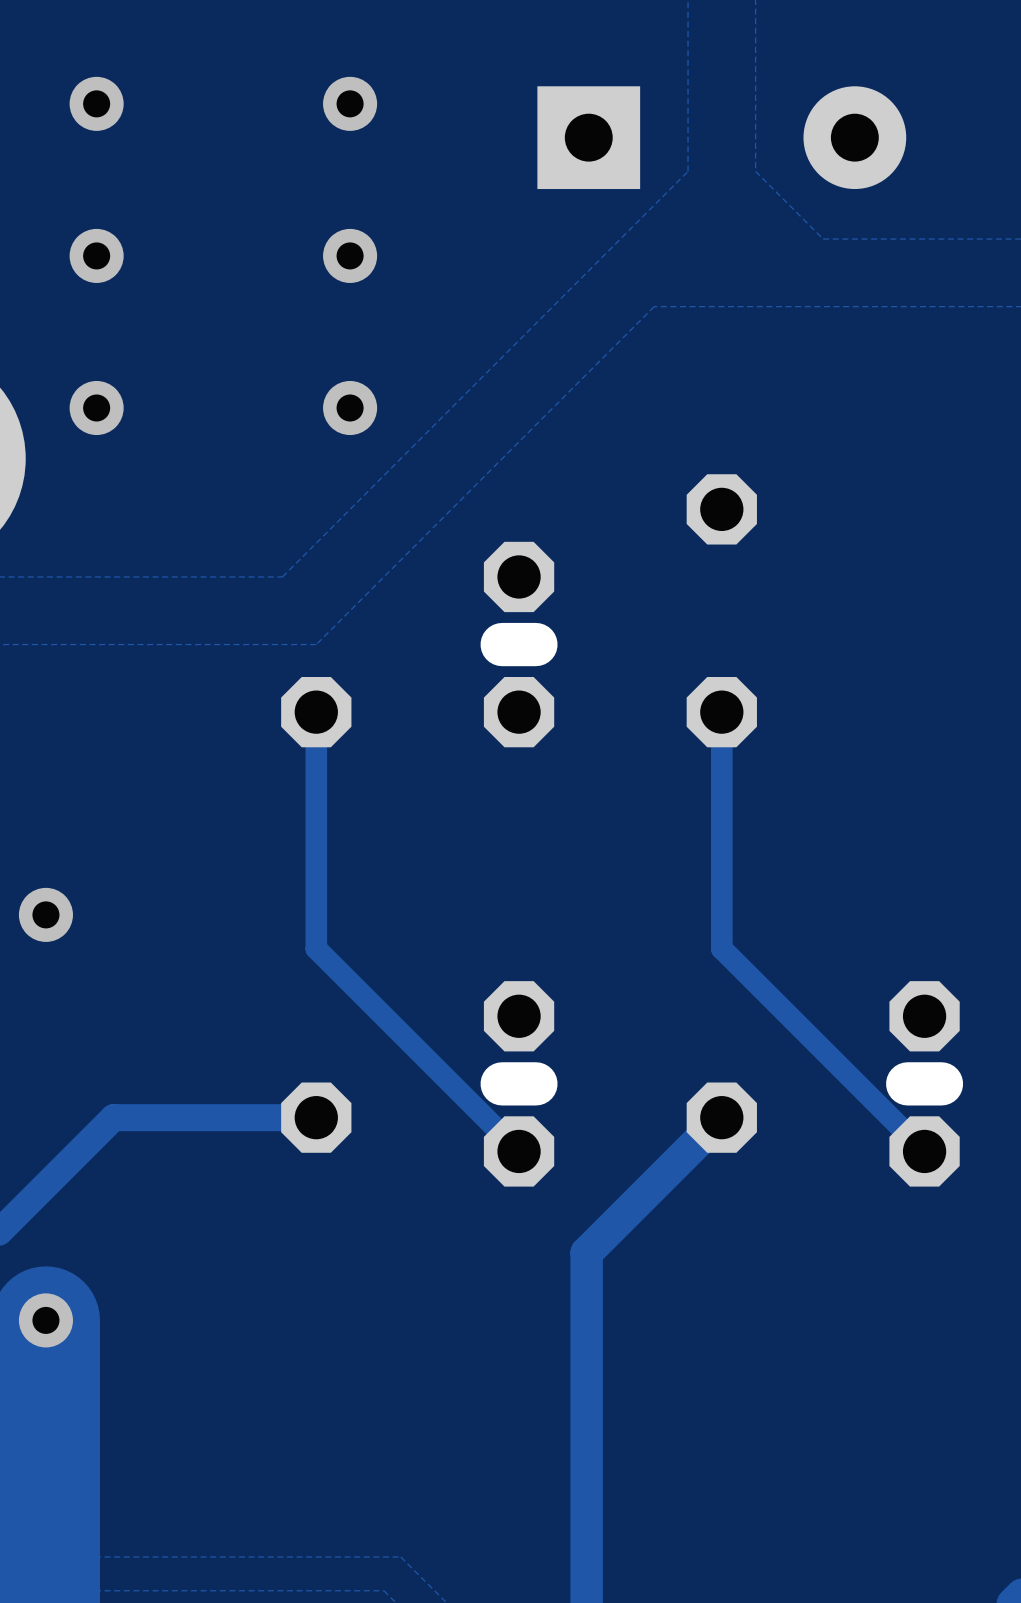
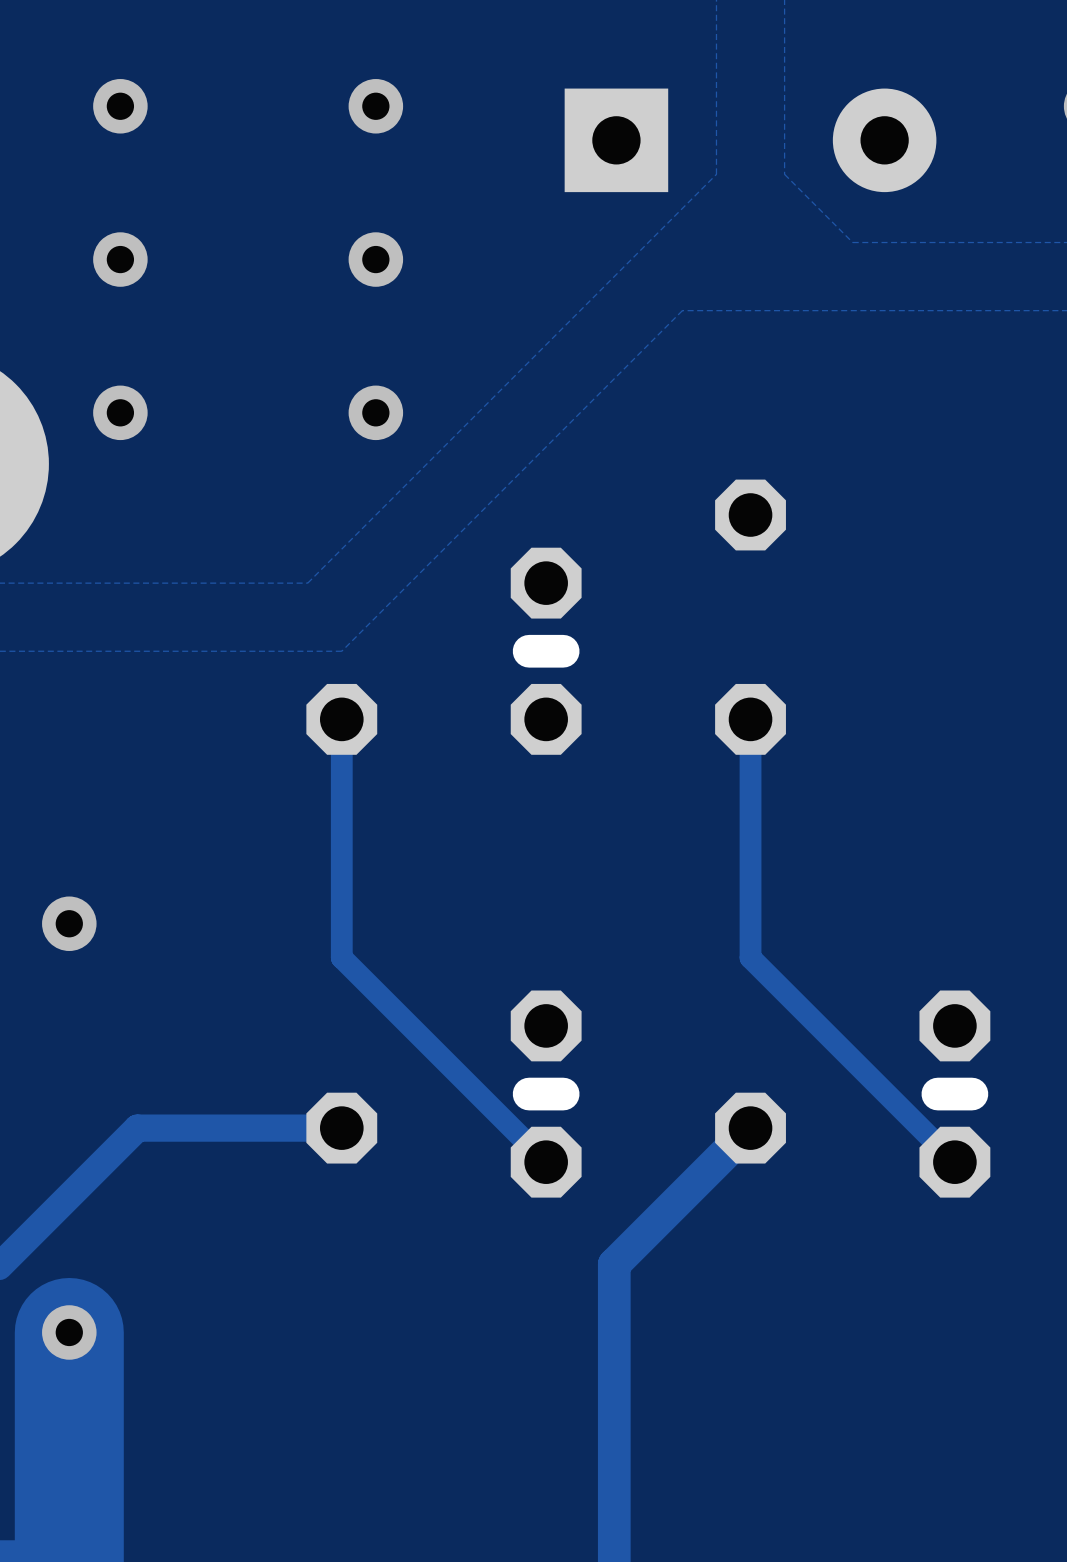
line width: thick (535, 644) (502, 644) -> thin (563, 651) (529, 651)
line width: thick (535, 1083) (502, 1083) -> thin (563, 1094) (529, 1094)
line width: thick (941, 1083) (907, 1083) -> thin (971, 1094) (937, 1094)

